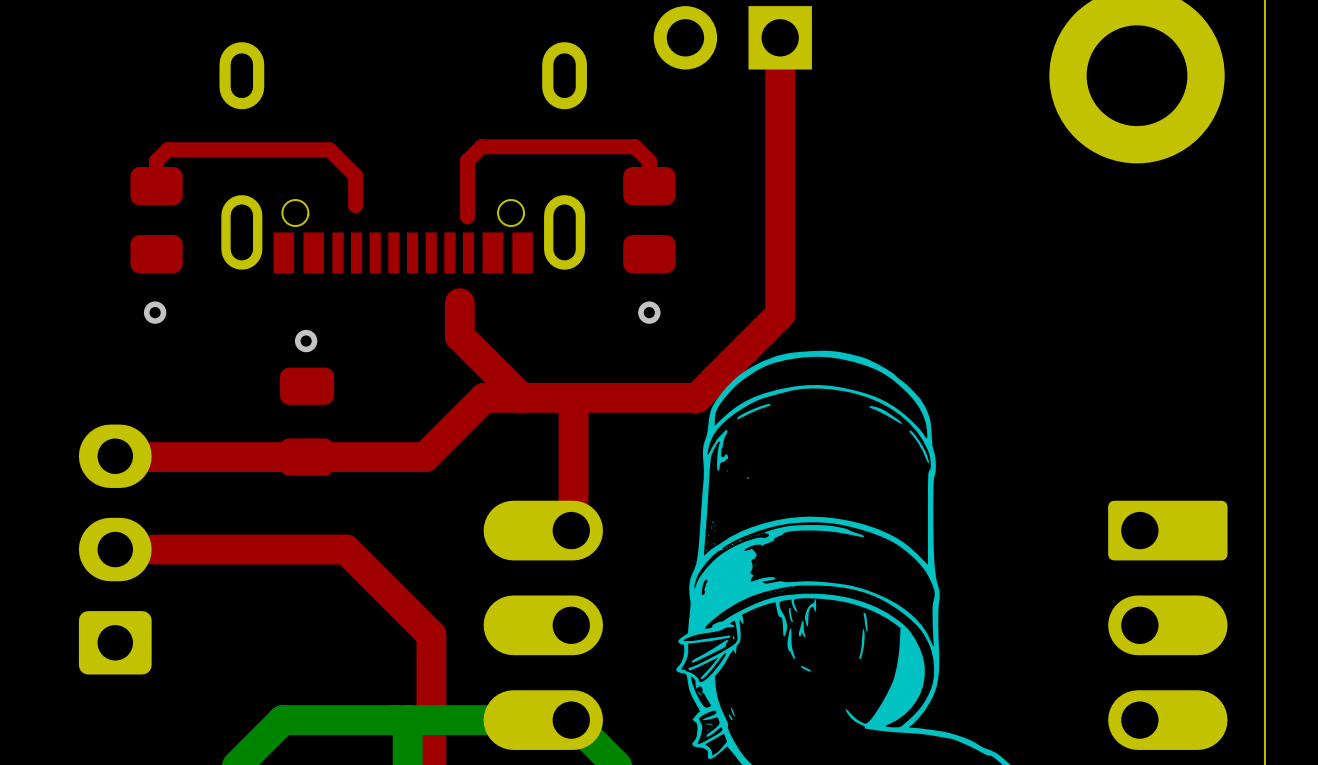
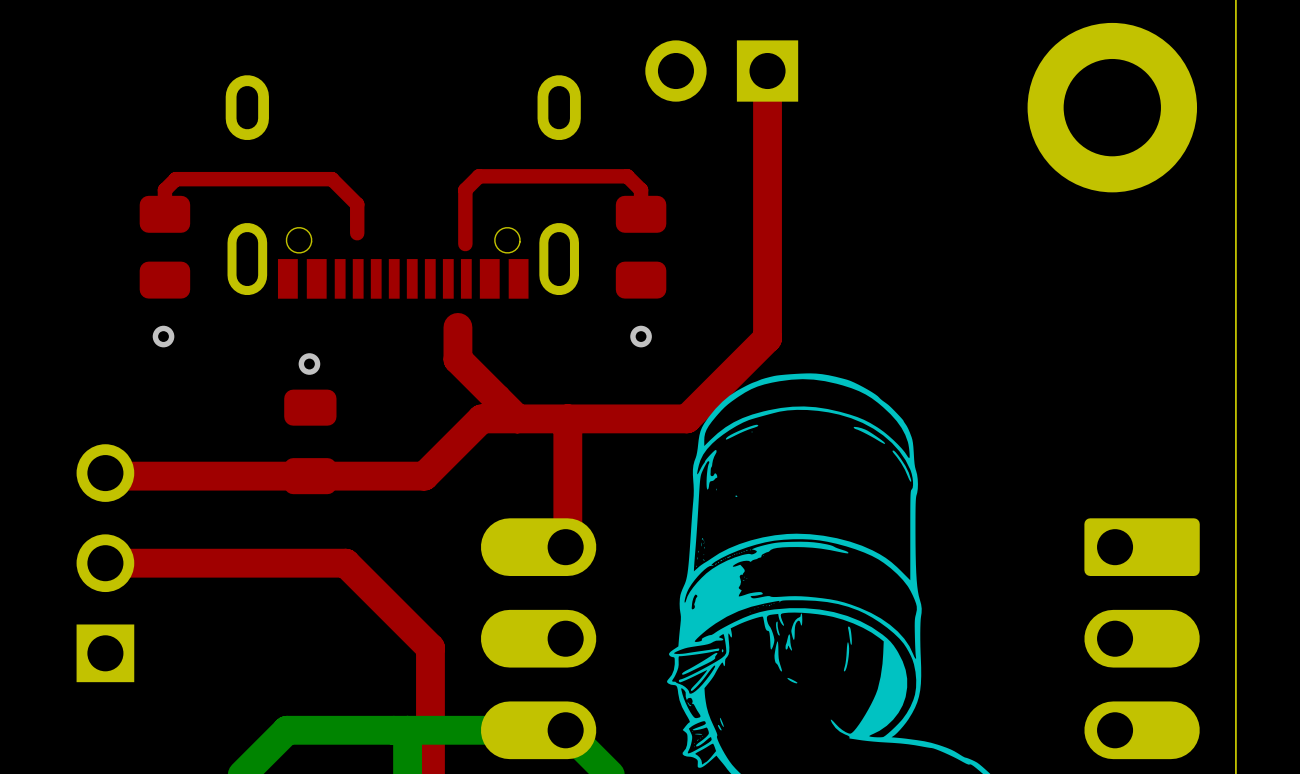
part footprint: [78, 424, 152, 675] -> [76, 444, 135, 683]
top track: (346, 549) (153, 549) -> (348, 565) (345, 563) (105, 563)

